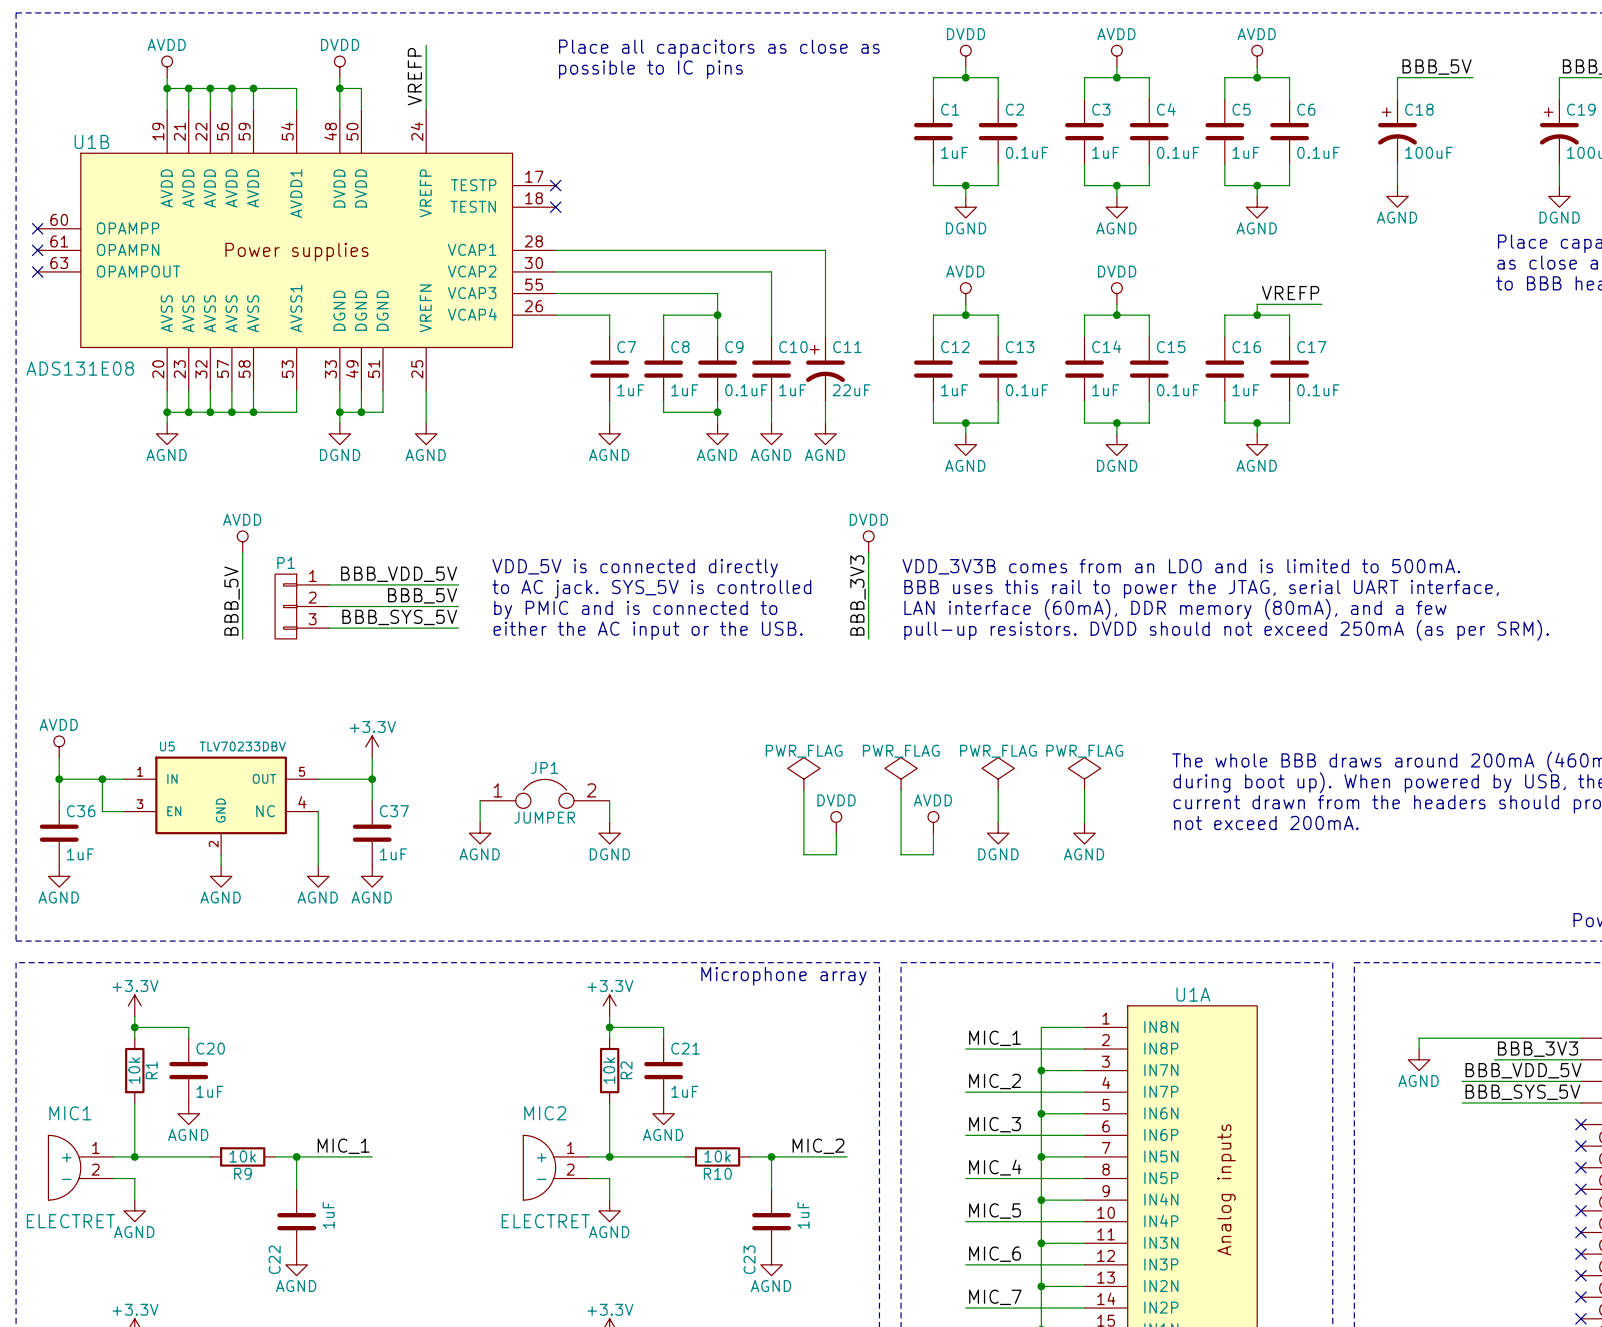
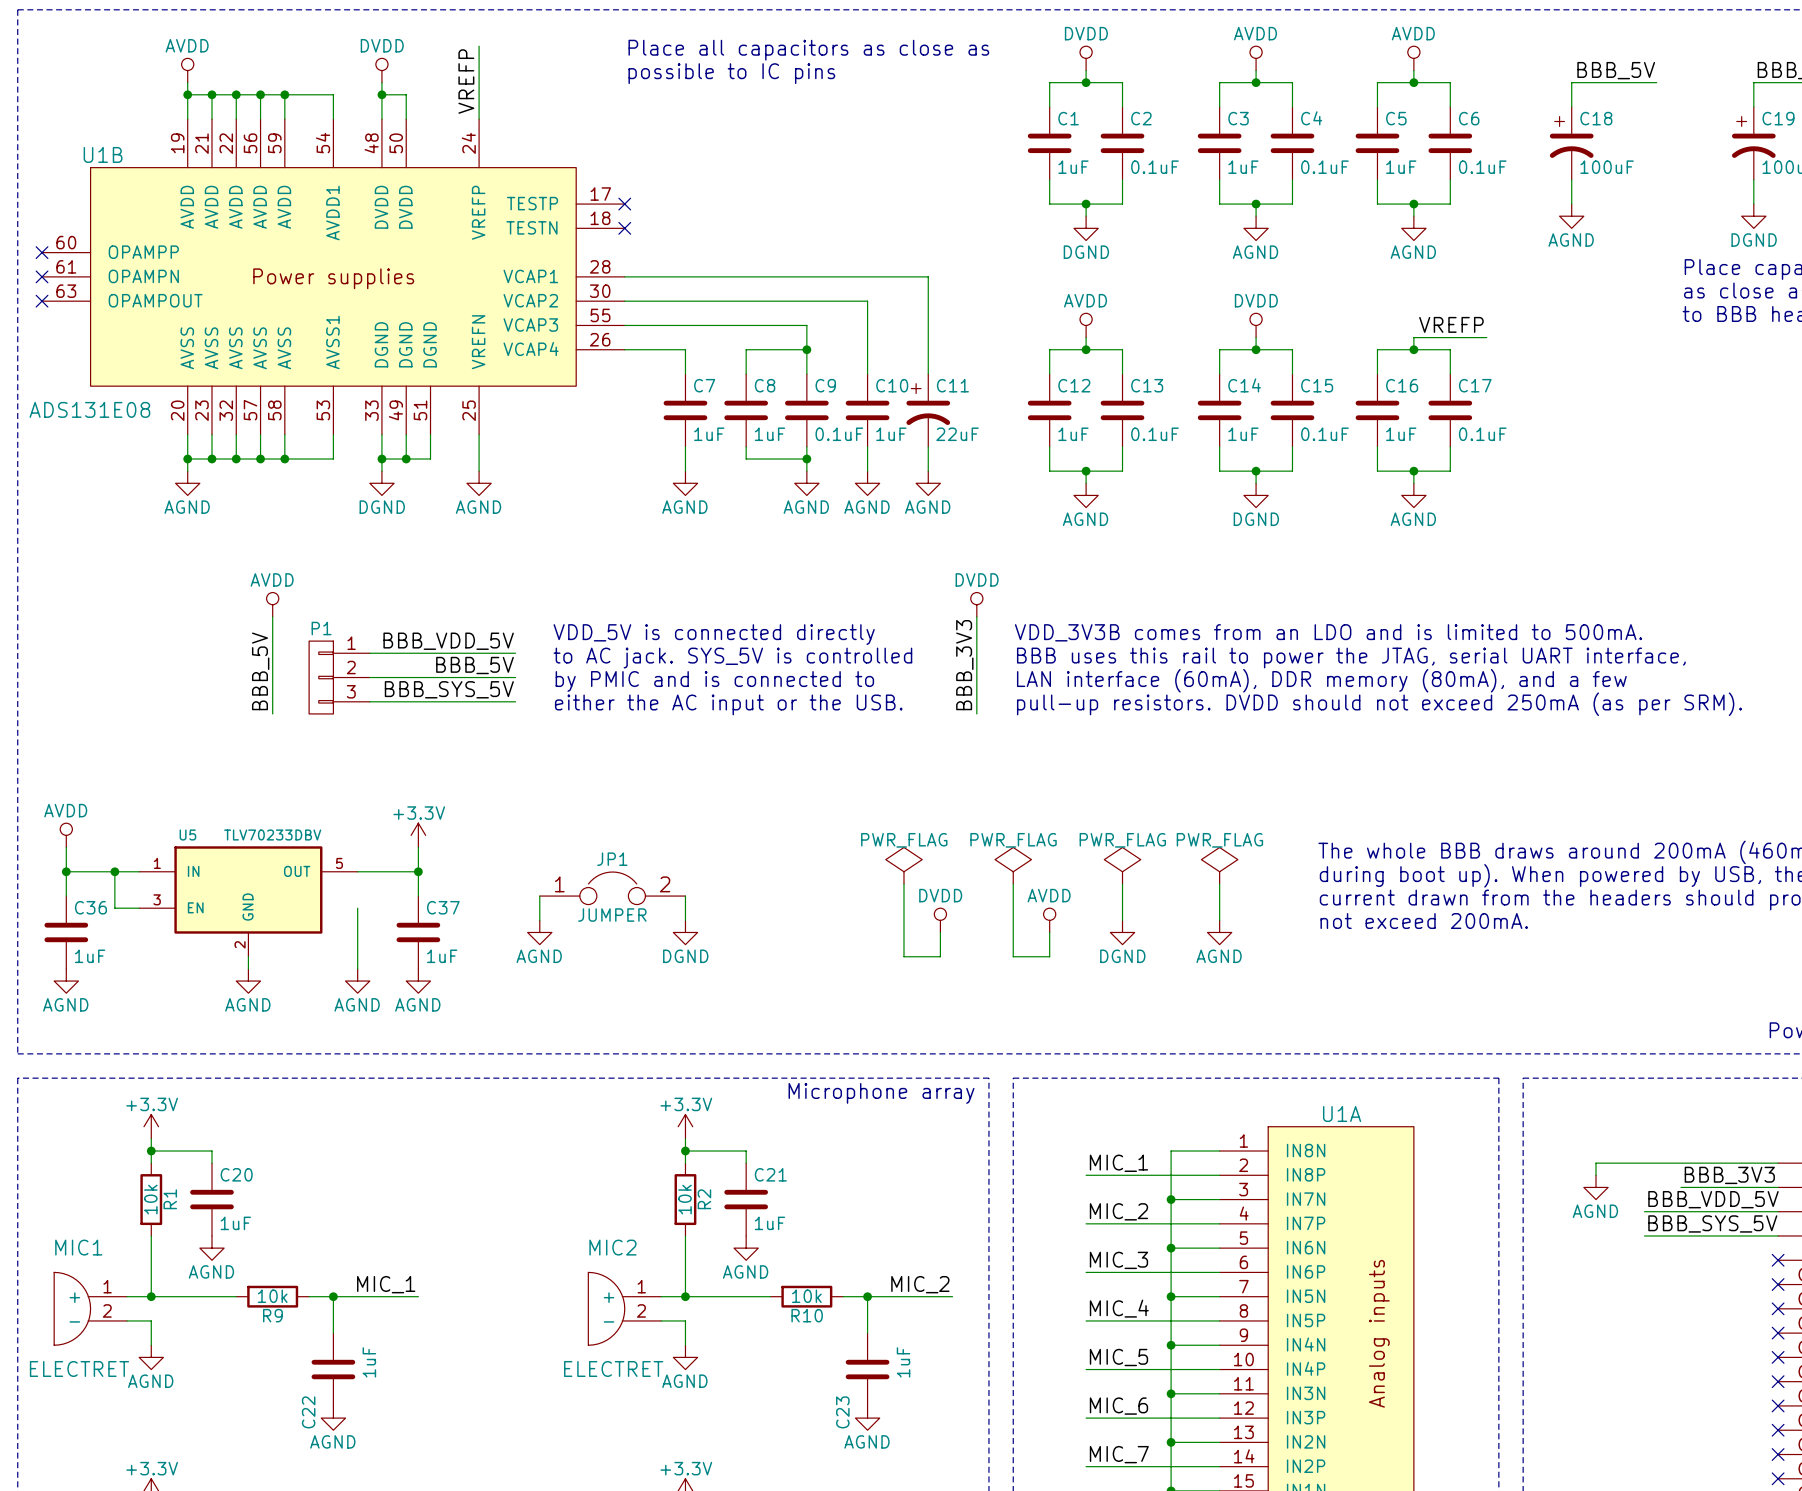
U5 symbol: [123, 756, 319, 855] -> [139, 846, 358, 957]

